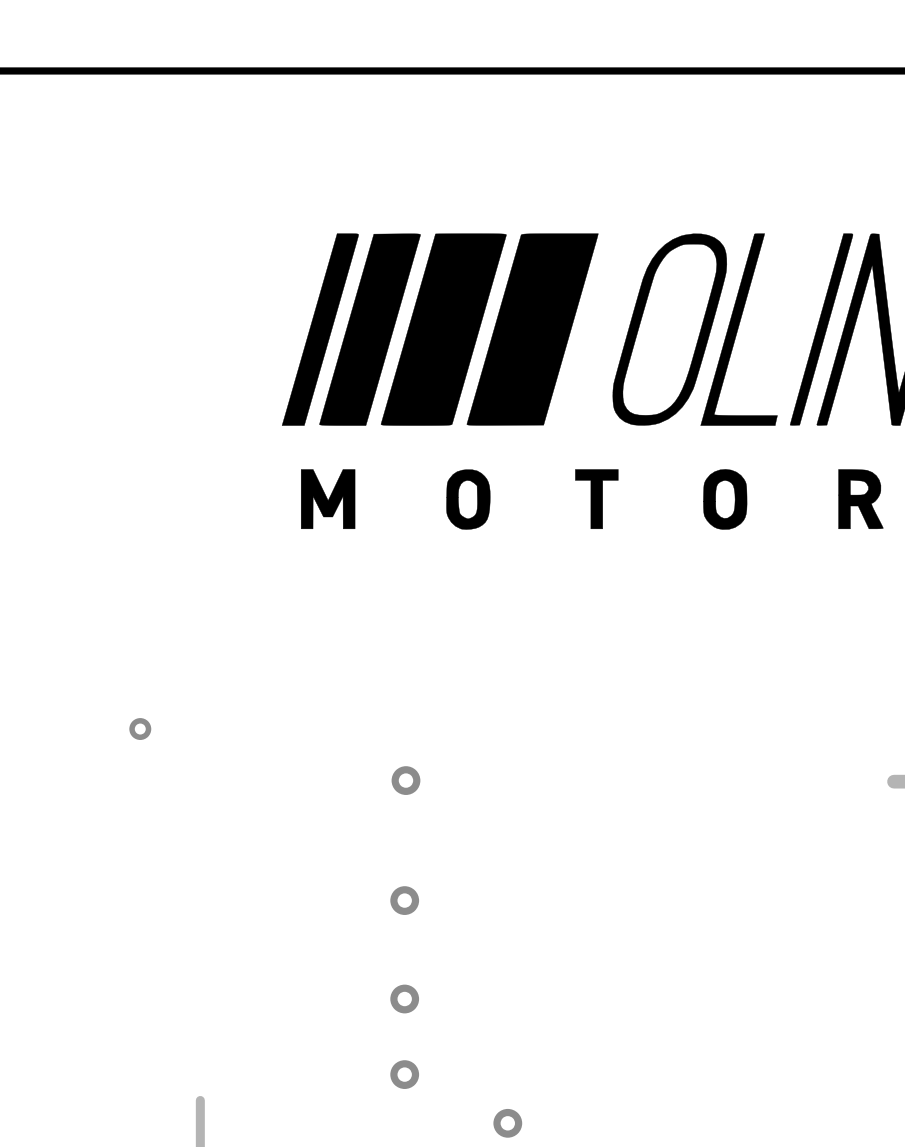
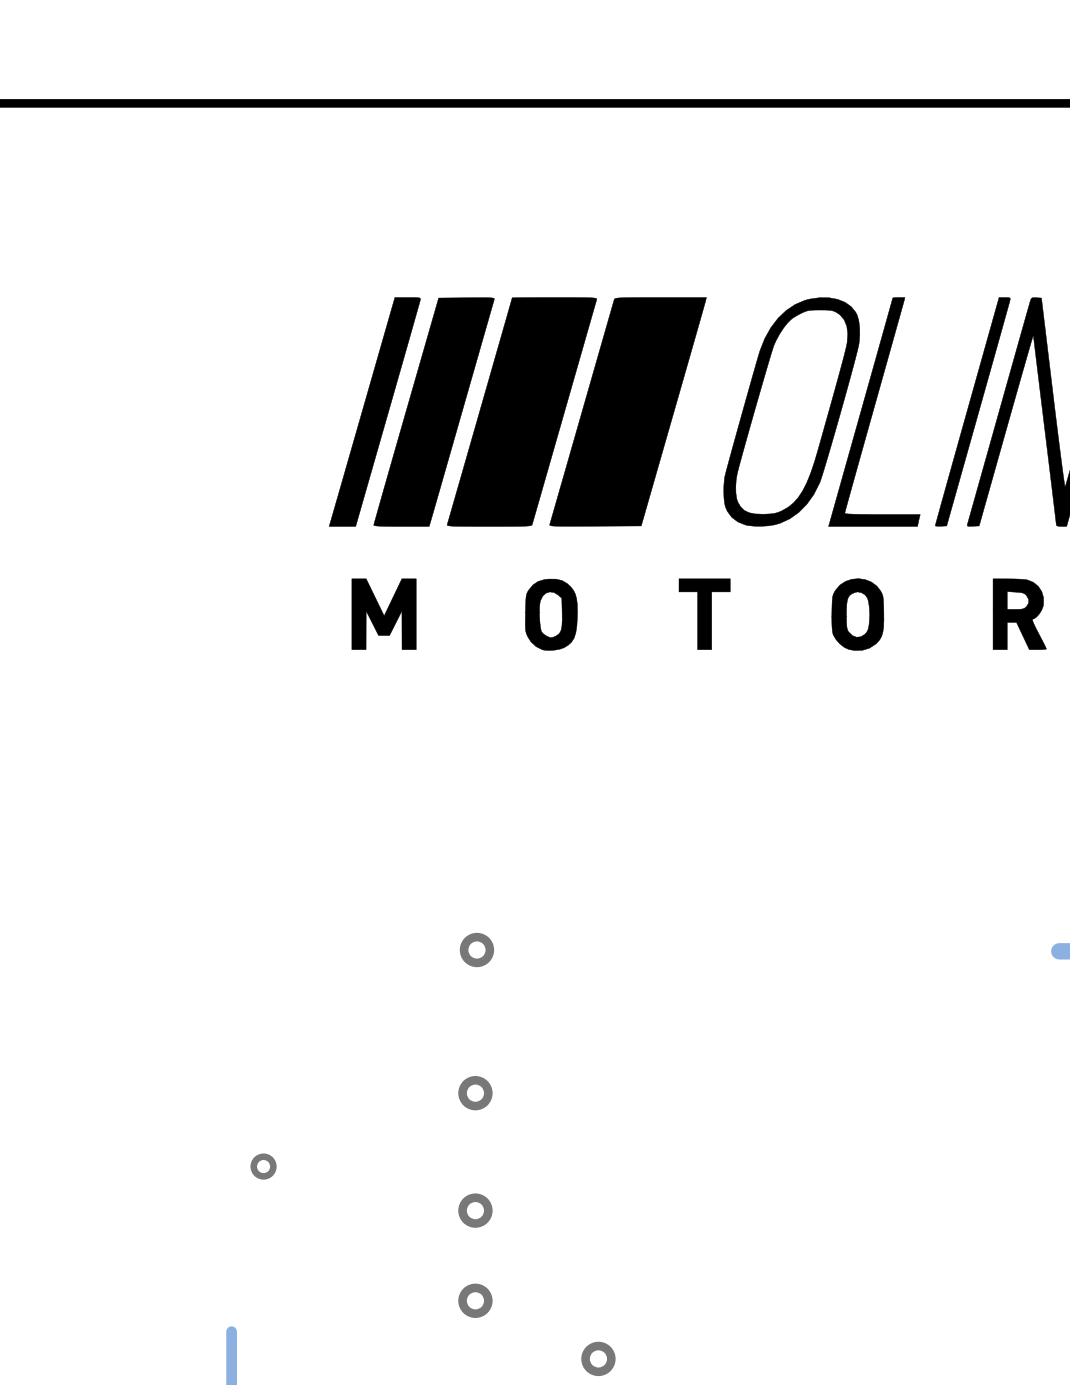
via: (140, 729) -> none
via: none -> (263, 1166)

